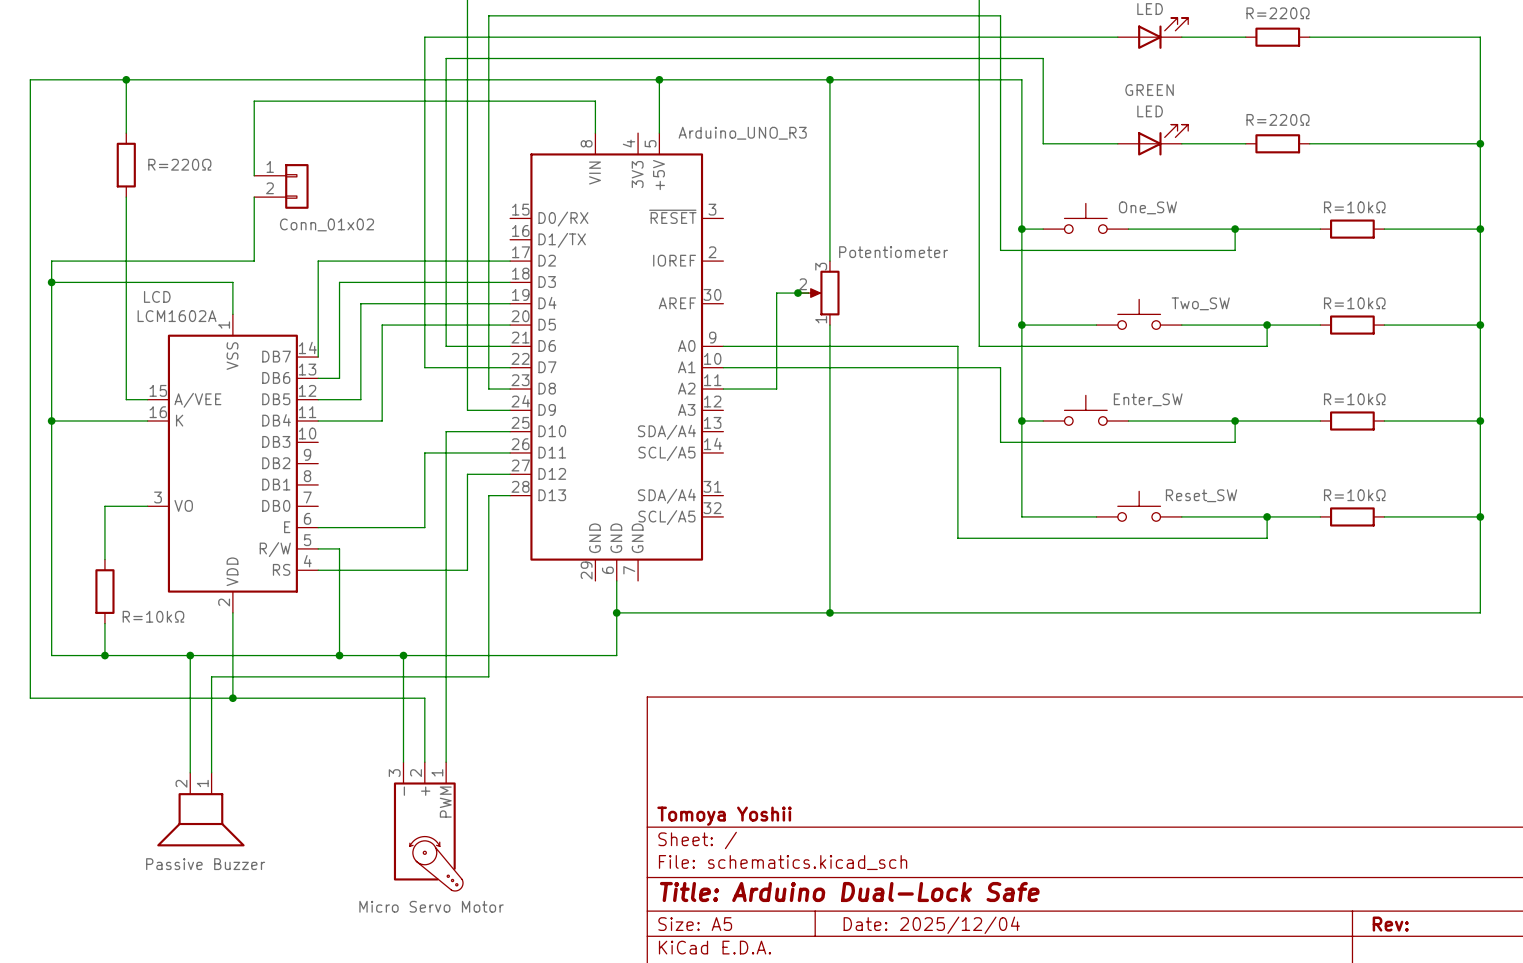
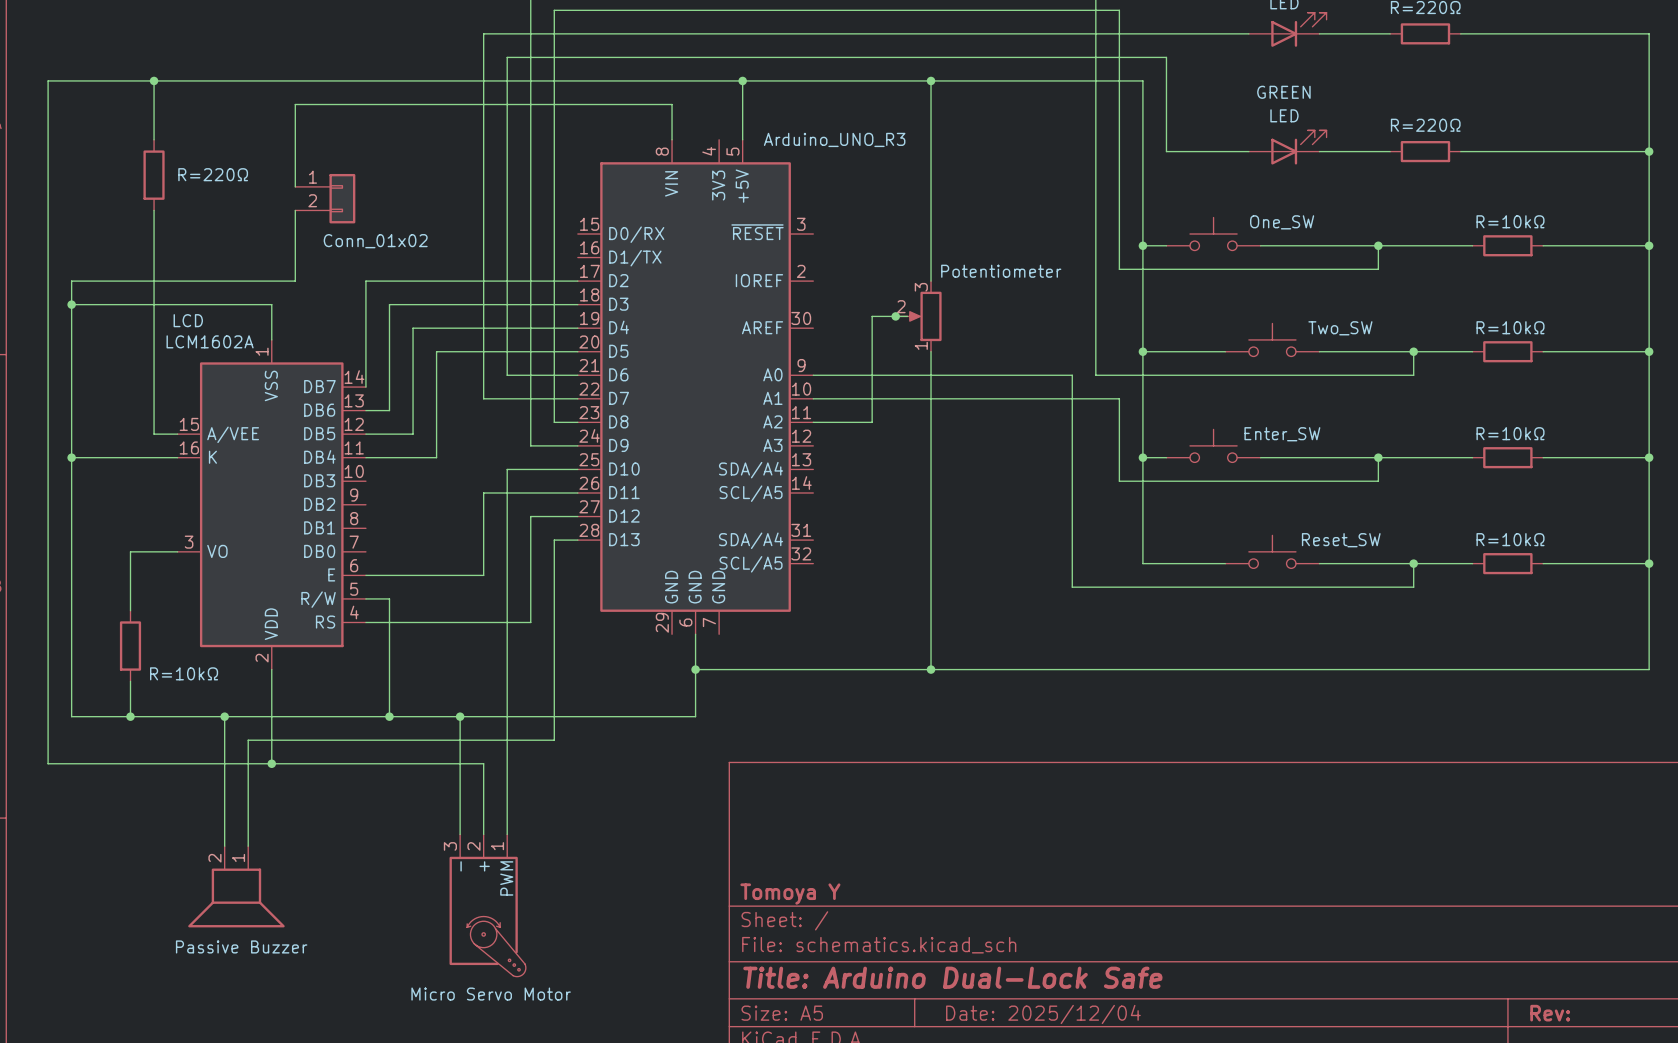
title block: Tomoya Yoshii (724, 816) -> Tomoya Y (790, 894)

